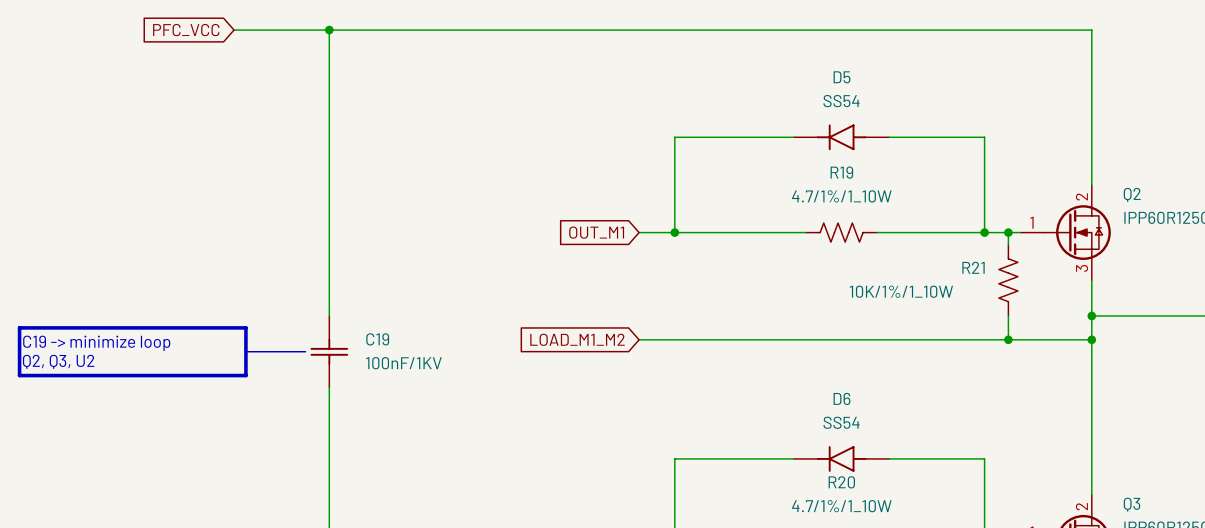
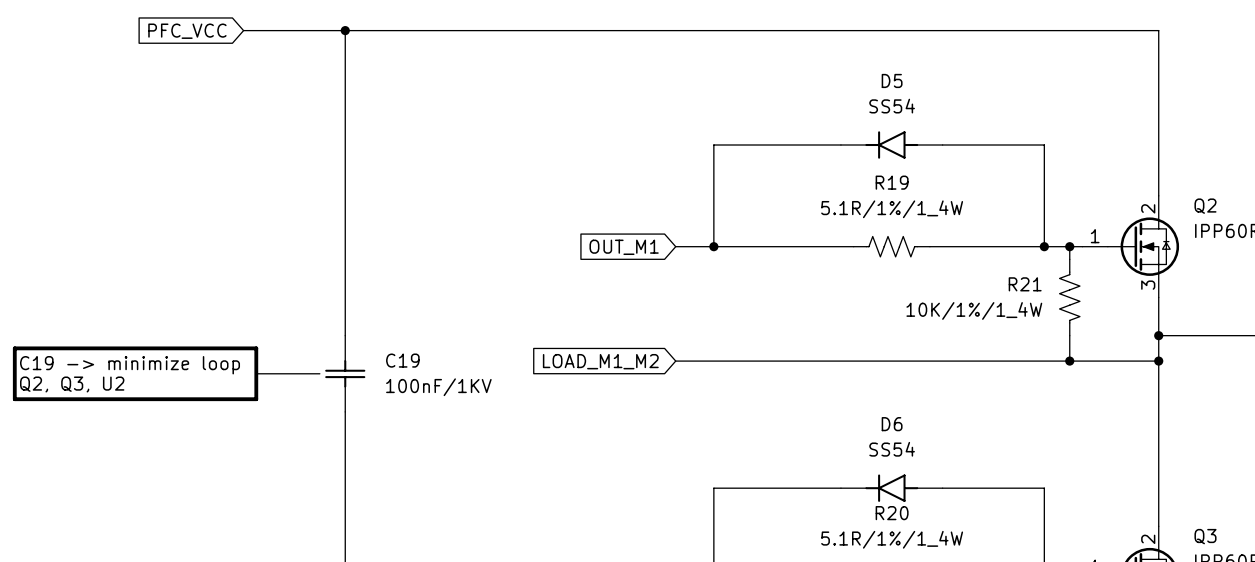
R19 value: 4.7/1%/1_10W (841, 196) -> 5.1R/1%/1_4W (892, 209)
R21 flip: as is (1008, 280) -> left-right (1069, 297)
R21 value: 10K/1%/1_10W (901, 291) -> 10K/1%/1_4W (974, 310)
R20 value: 4.7/1%/1_10W (841, 506) -> 5.1R/1%/1_4W (892, 539)

